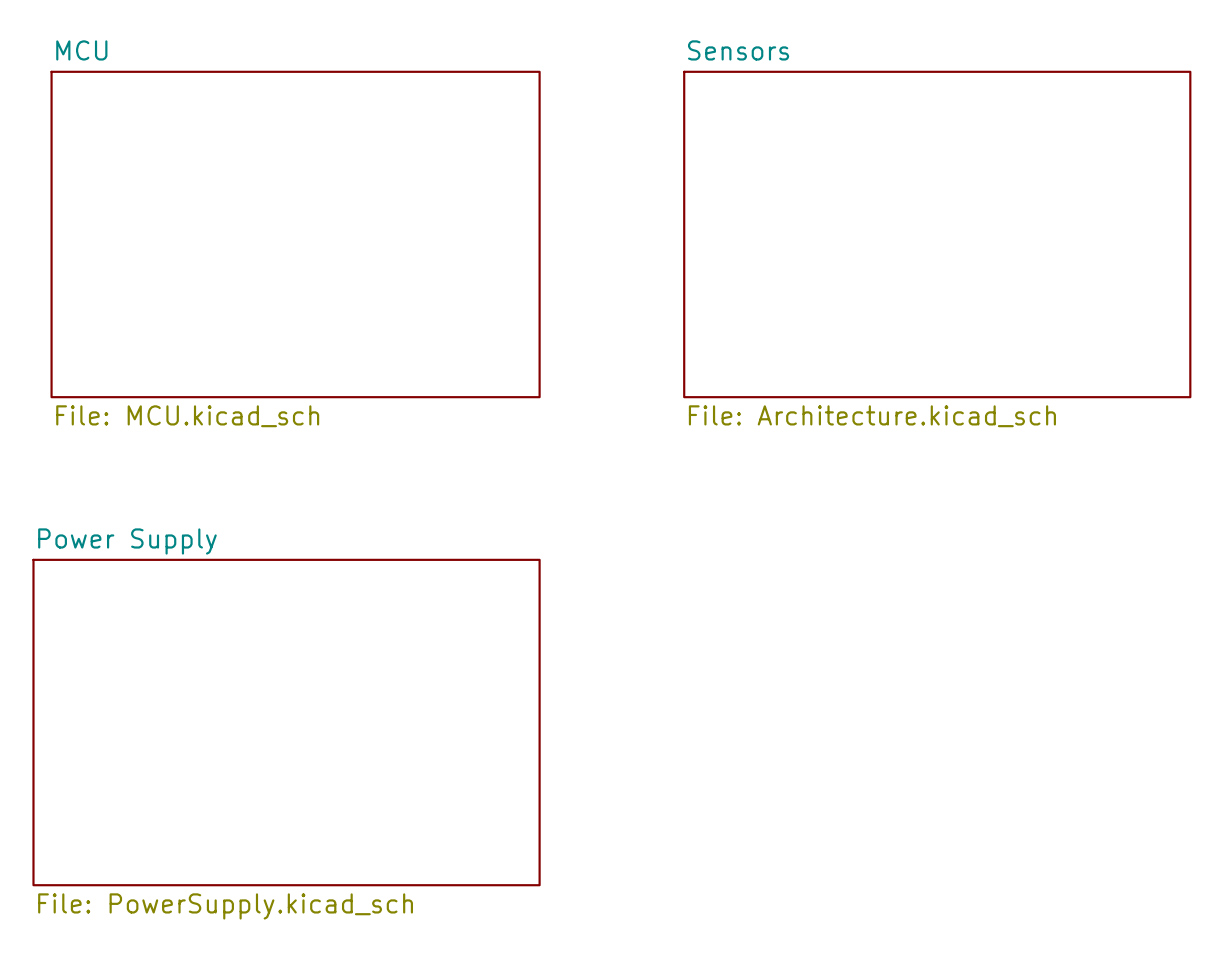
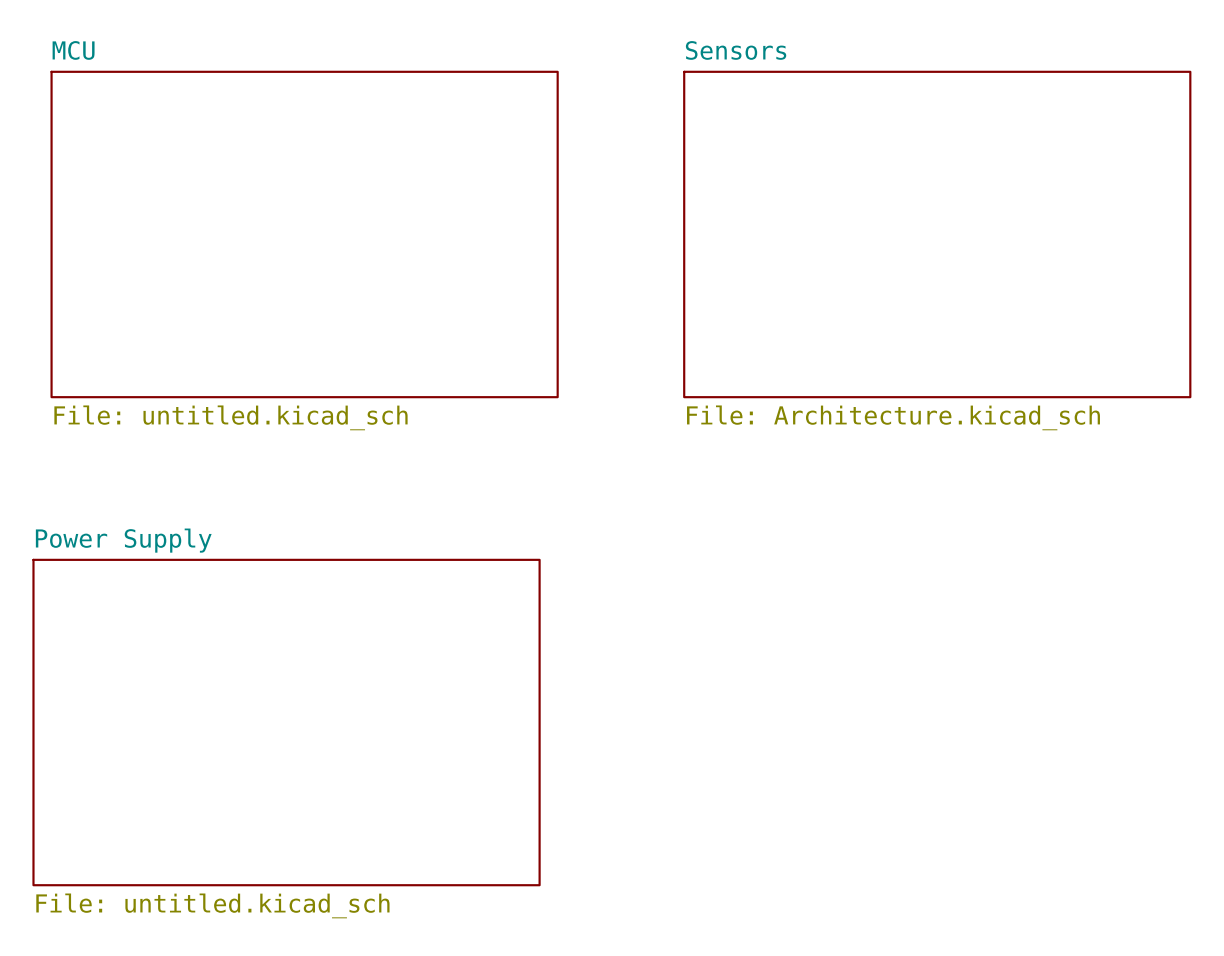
sheet MCU shape: [50, 70, 541, 399] -> [50, 70, 559, 399]
sheet MCU value: File: MCU.kicad_sch (187, 416) -> File: untitled.kicad_sch (230, 417)
sheet Power Supply value: File: PowerSupply.kicad_sch (225, 906) -> File: untitled.kicad_sch (212, 905)

